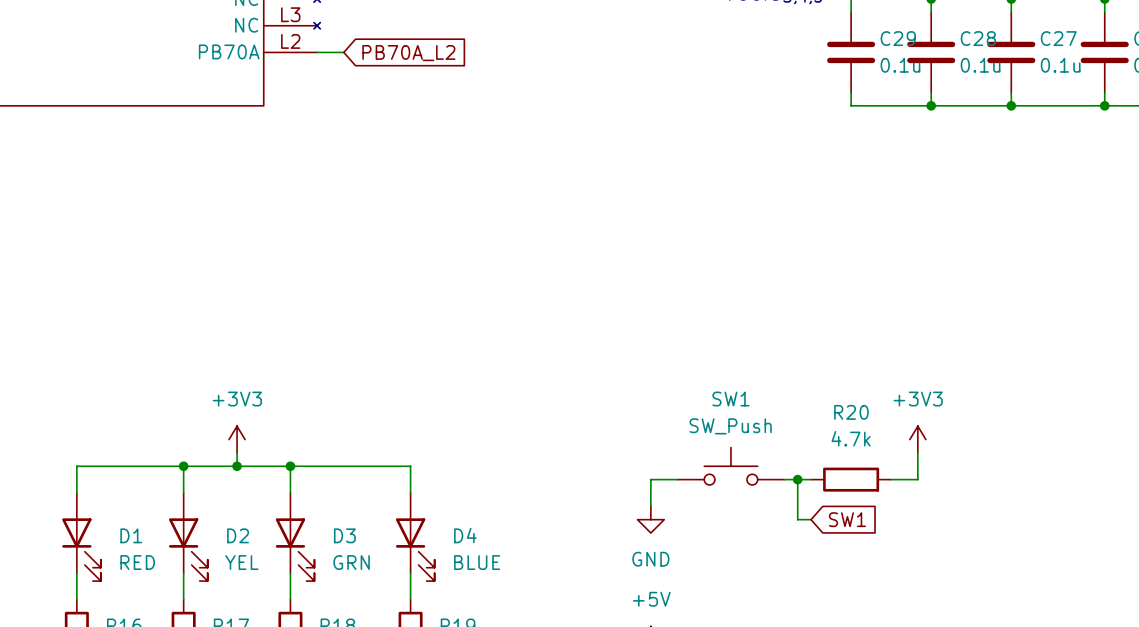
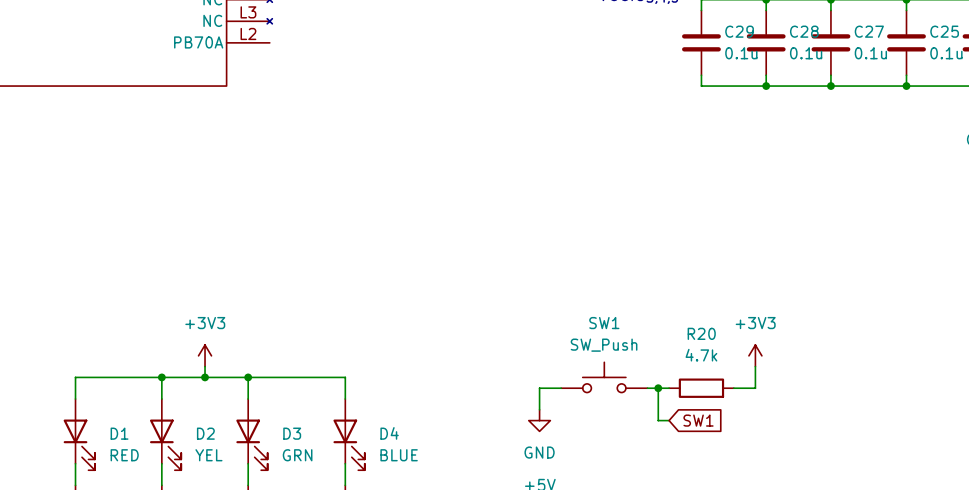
wire: (317, 52) (343, 52) -> none
global label: PB70A_L2 (408, 53) -> none

